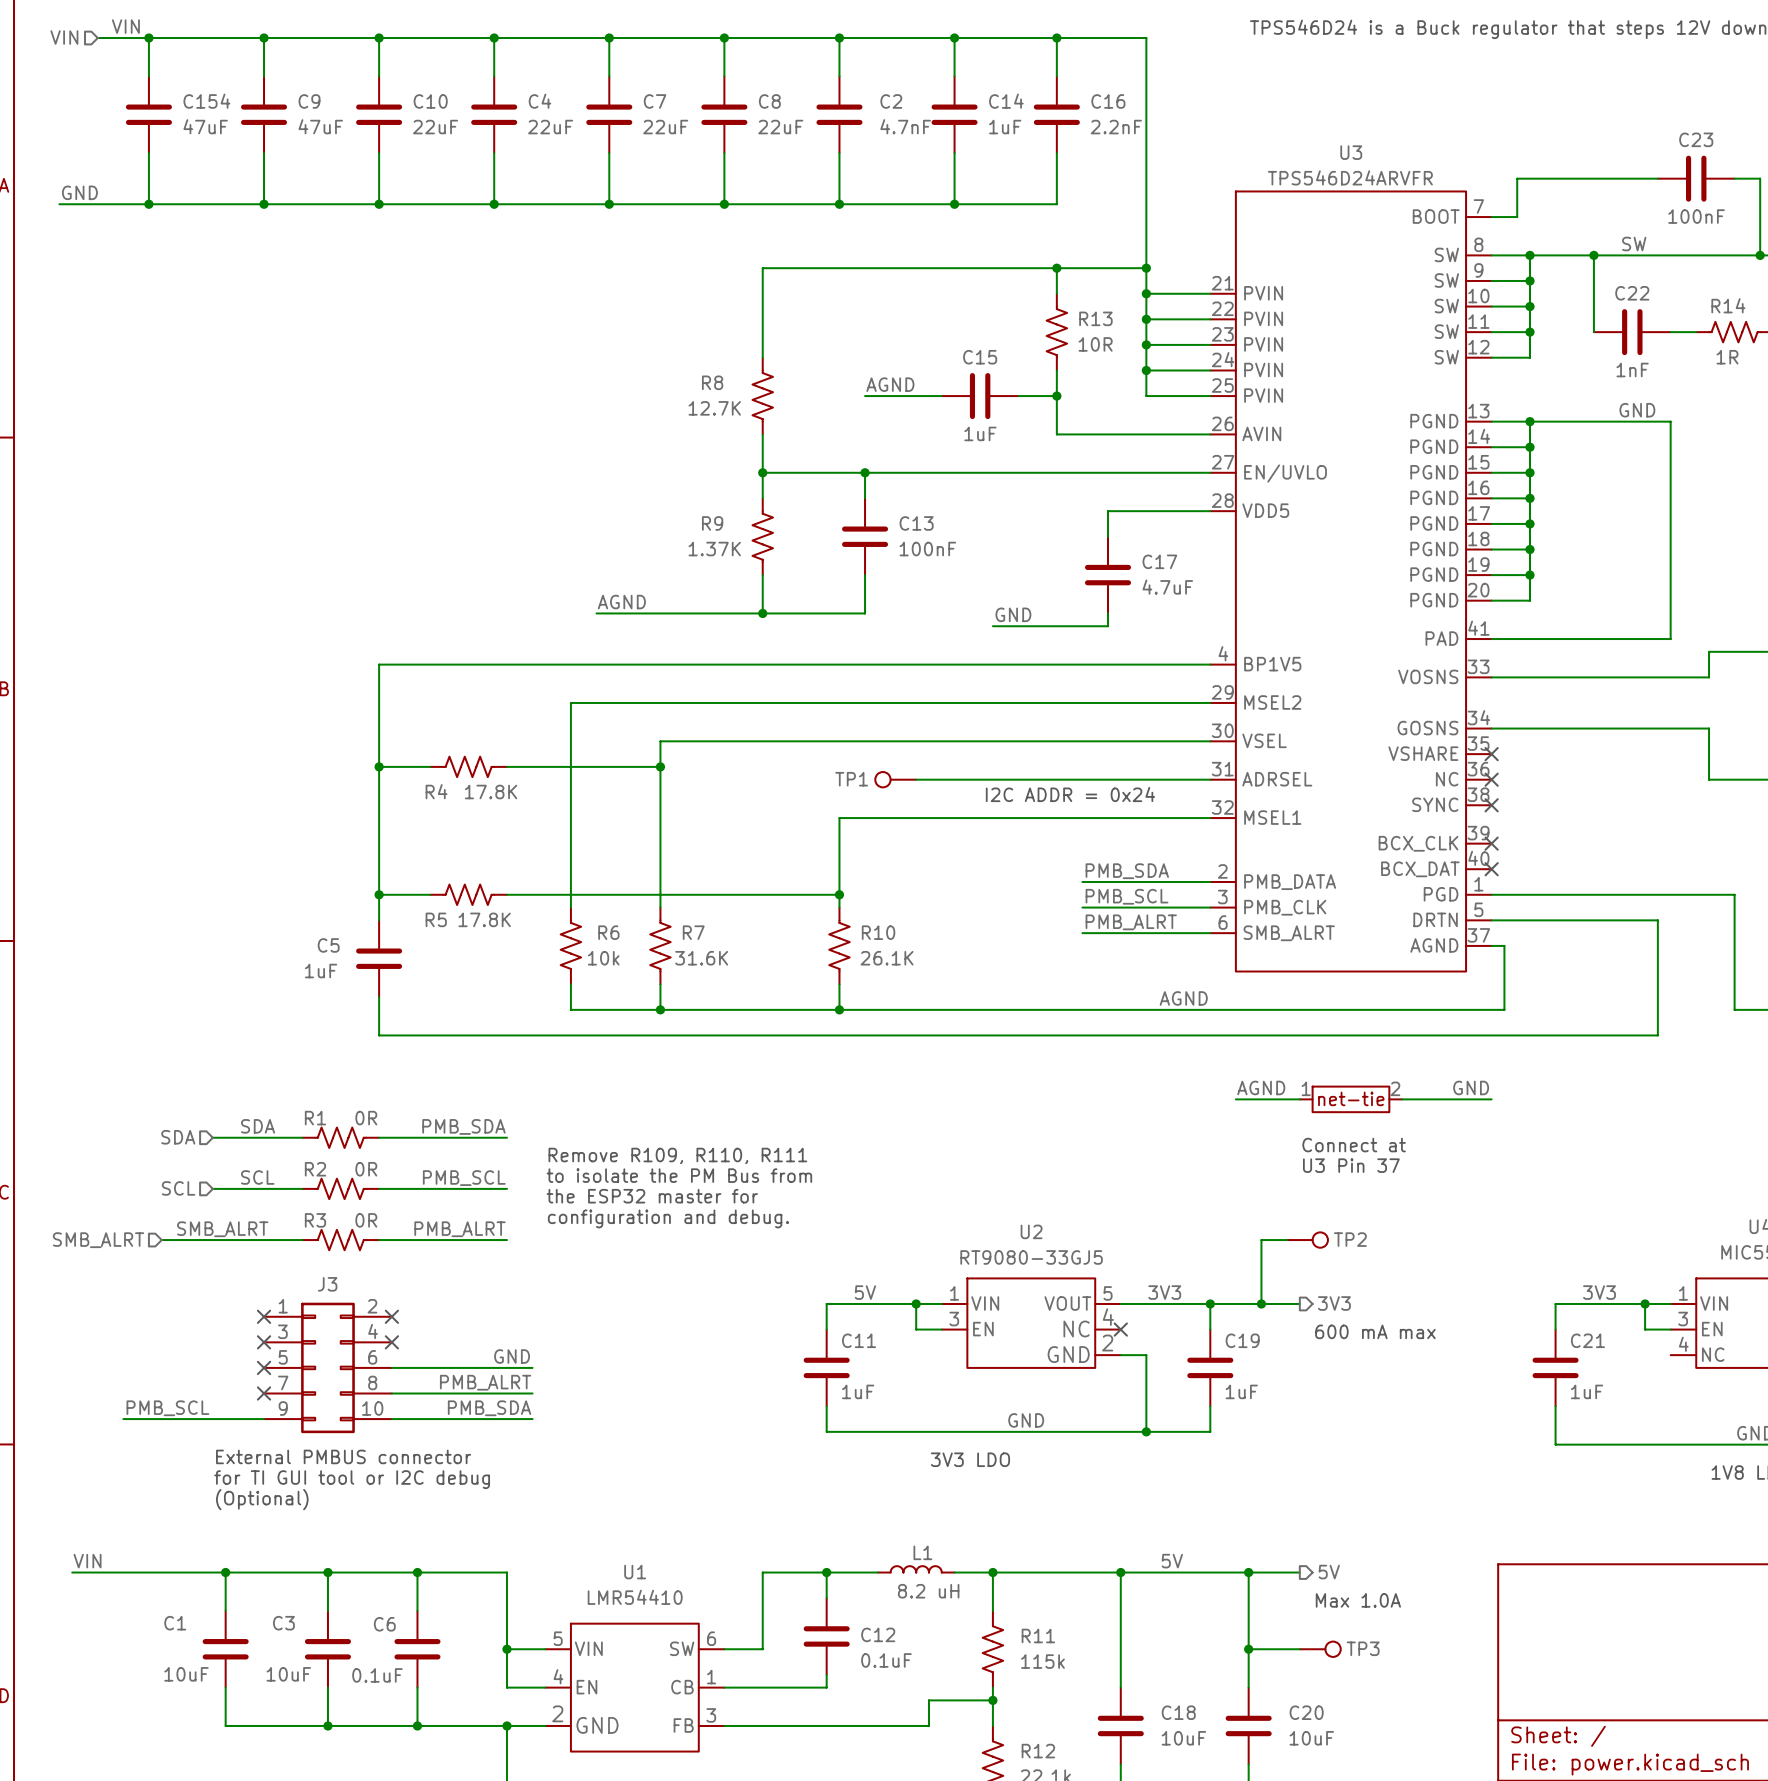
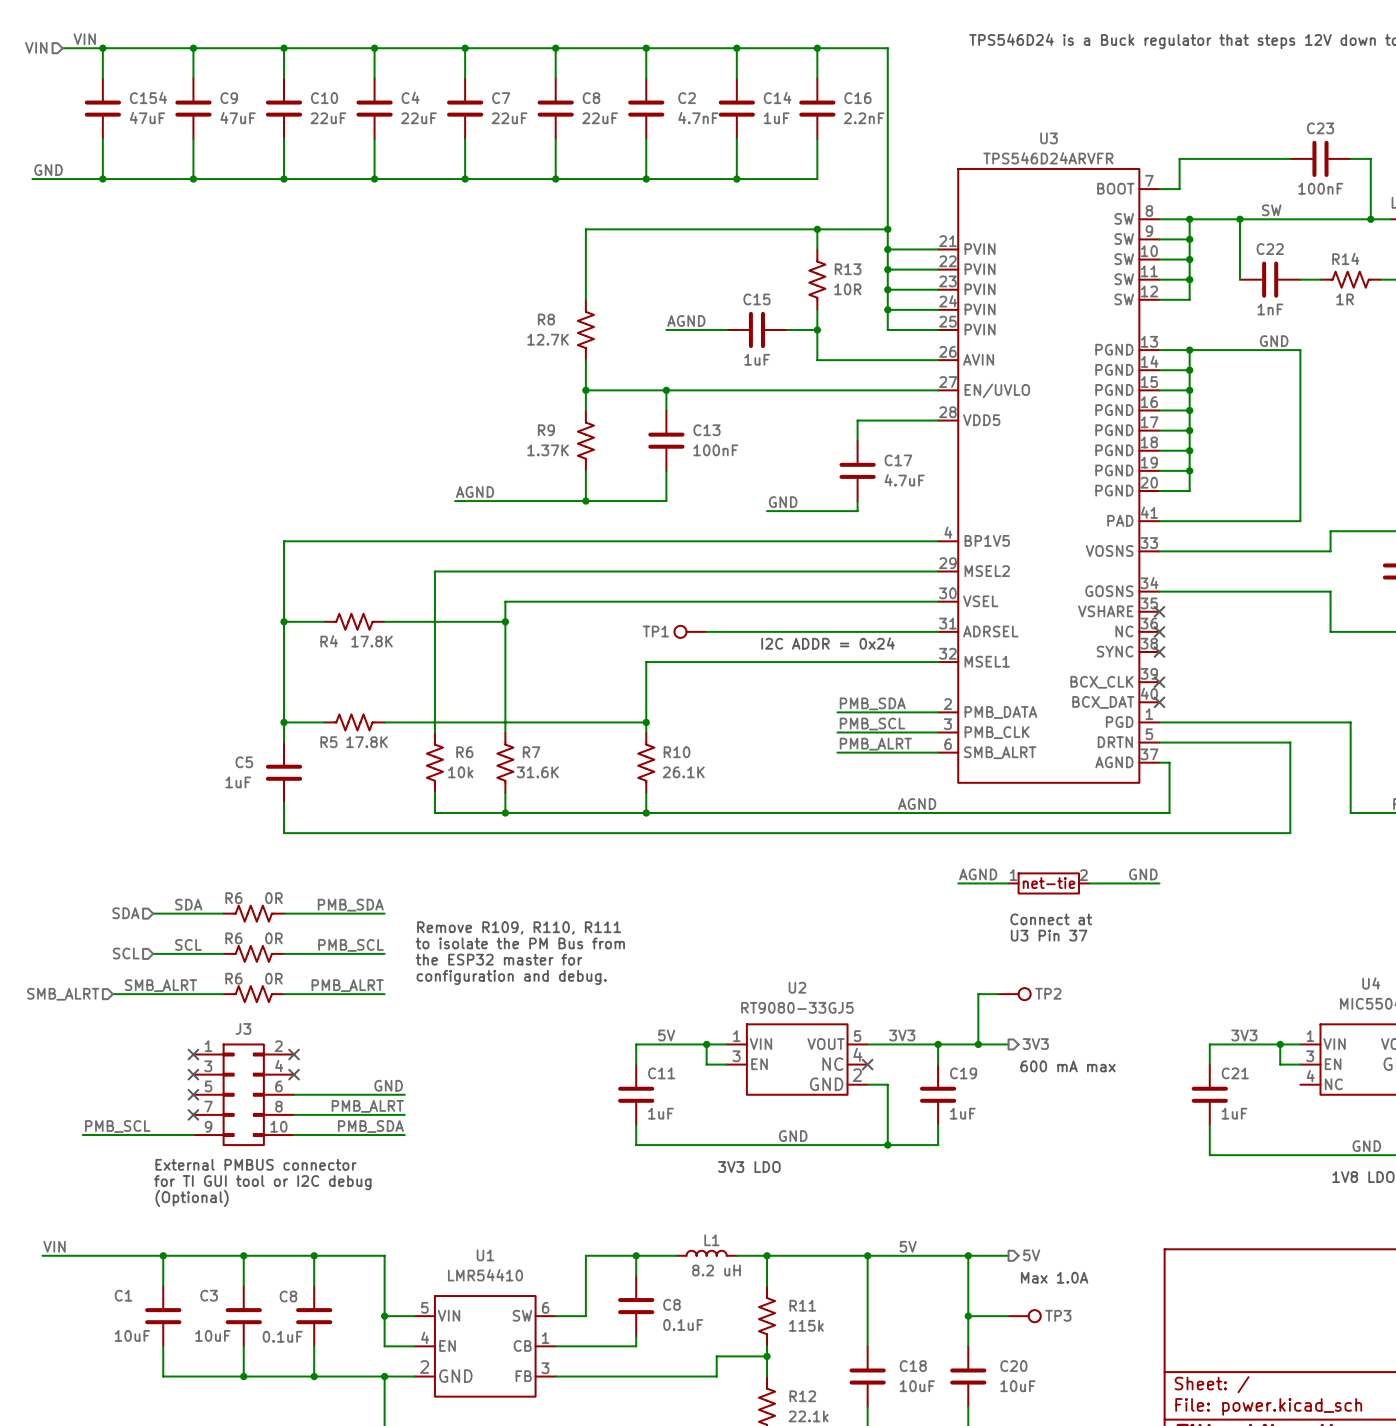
R1 name: R1 (315, 1118) -> R6 (233, 898)
R2 name: R2 (315, 1169) -> R6 (233, 938)
R3 name: R3 (315, 1220) -> R6 (233, 978)
C6 name: C6 (384, 1624) -> C8 (288, 1296)
C12 name: C12 (878, 1634) -> C8 (671, 1304)

